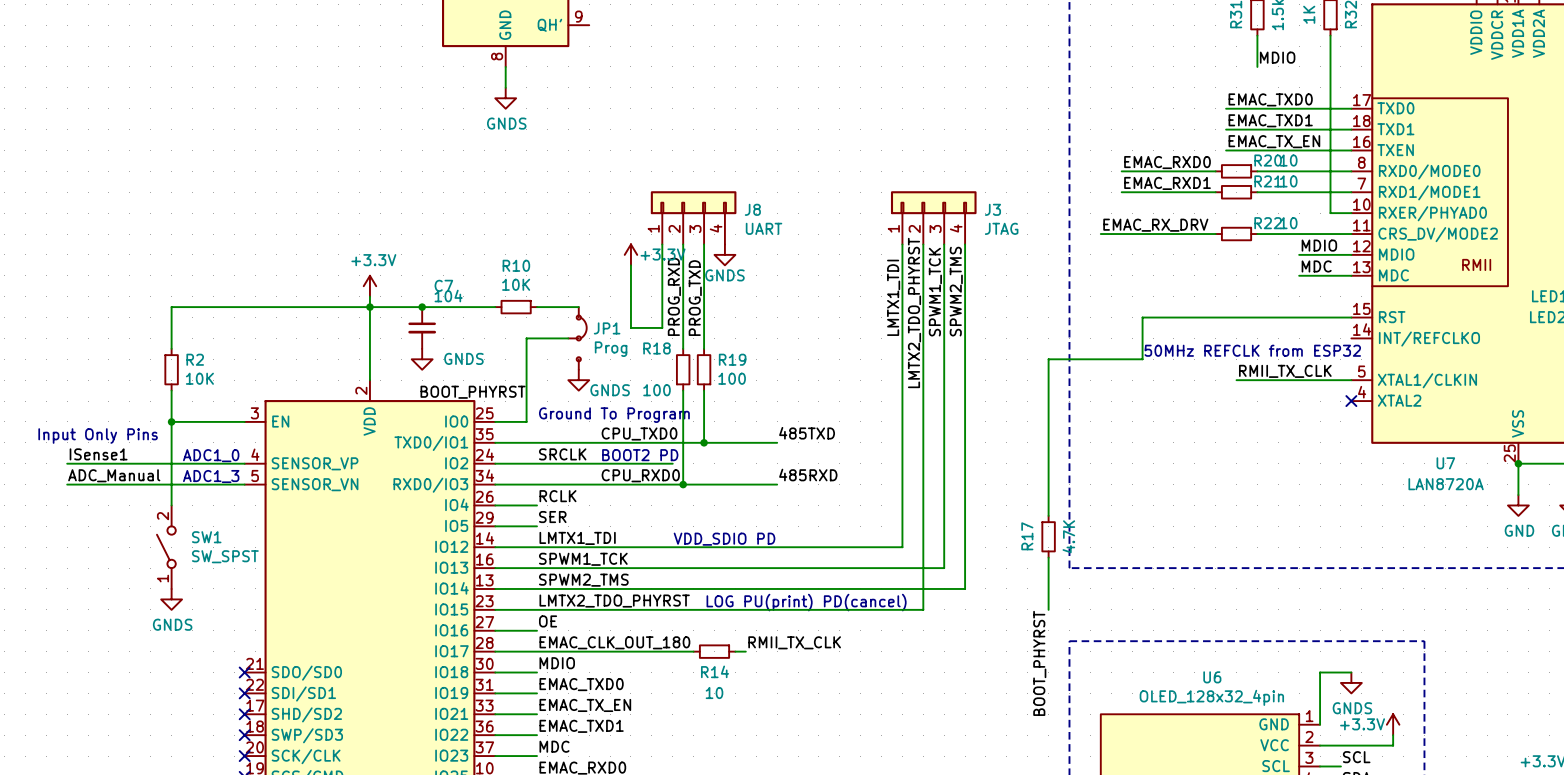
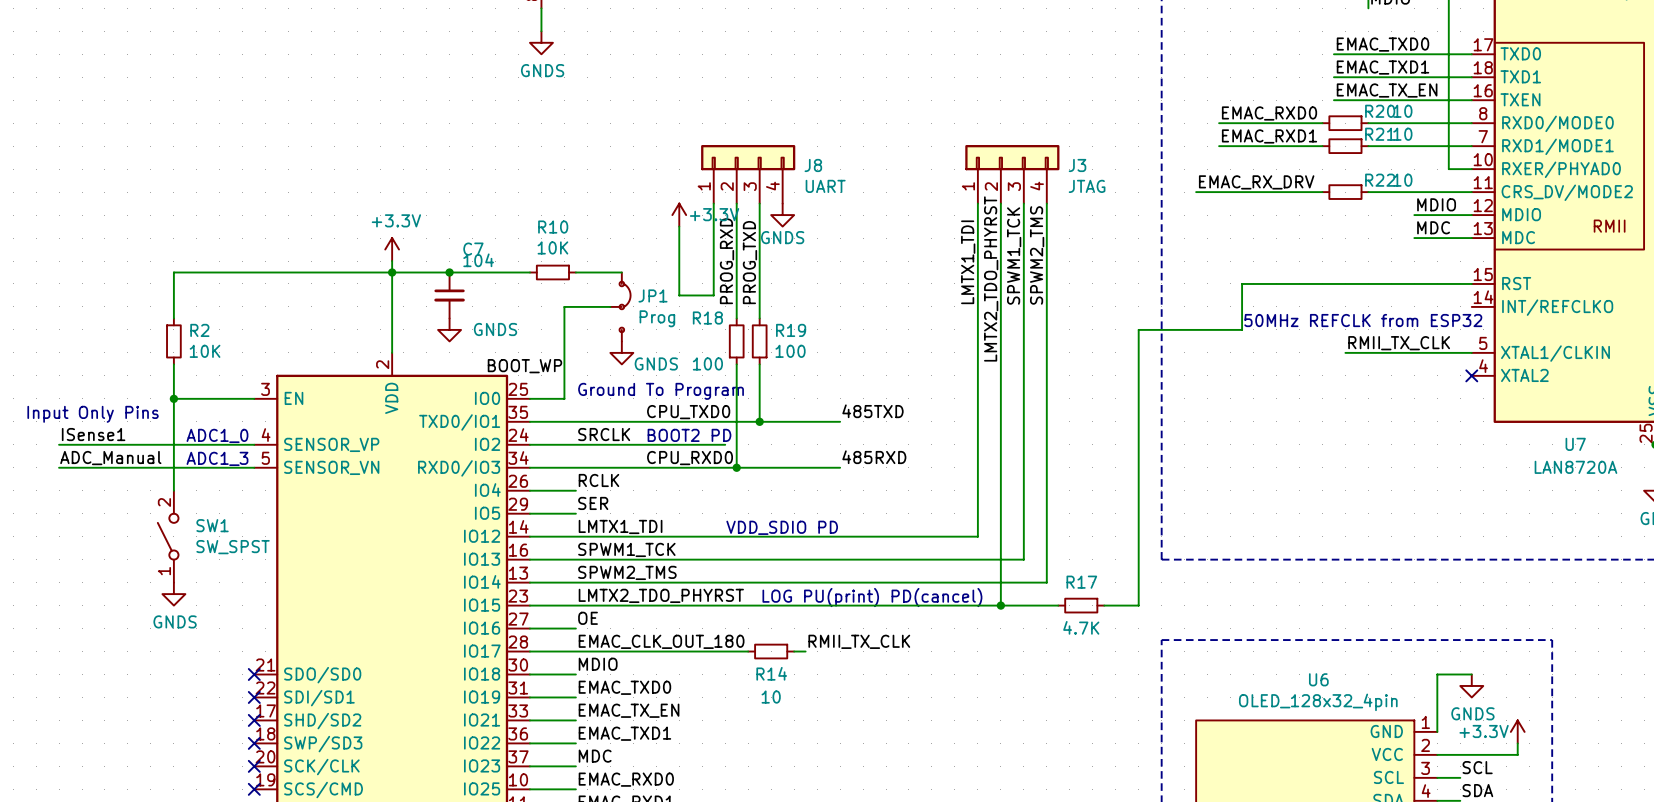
label: BOOT_PHYRST (473, 392) -> BOOT_WP (524, 366)
wire: none -> (1138, 502) (1138, 548)
R17 rotation: 0° (1048, 536) -> 90° clockwise (1081, 605)
R17 position: (1048, 536) -> (1081, 605)
wire: none -> (1000, 605) (1058, 605)
junction: none -> (1000, 605)
wire: none -> (1104, 605) (1138, 605)
label: BOOT_PHYRST (1039, 663) -> none

